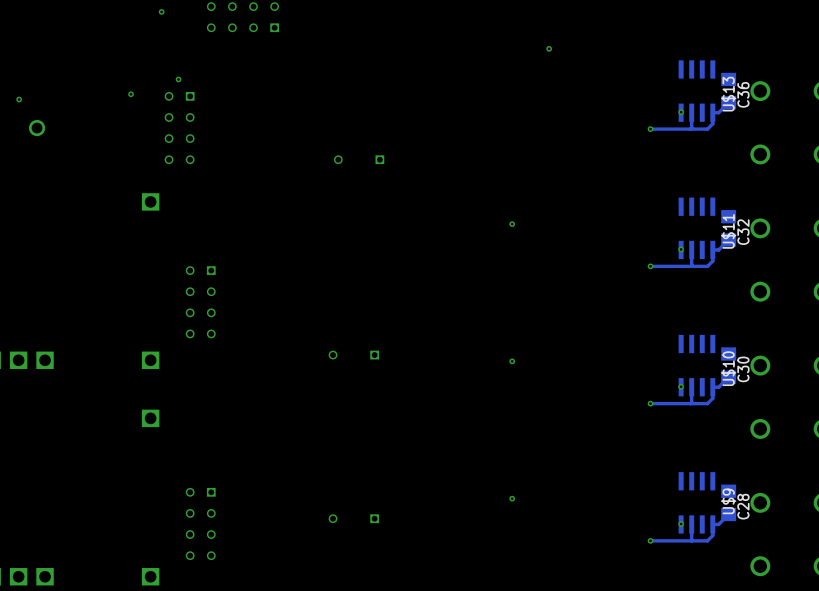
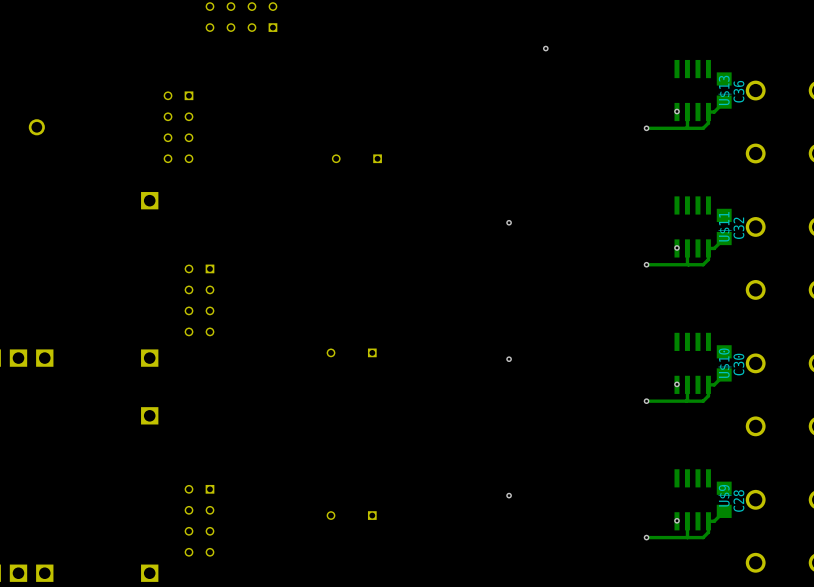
via: (161, 11) -> none
via: (178, 79) -> none
via: (131, 94) -> none
via: (19, 99) -> none

